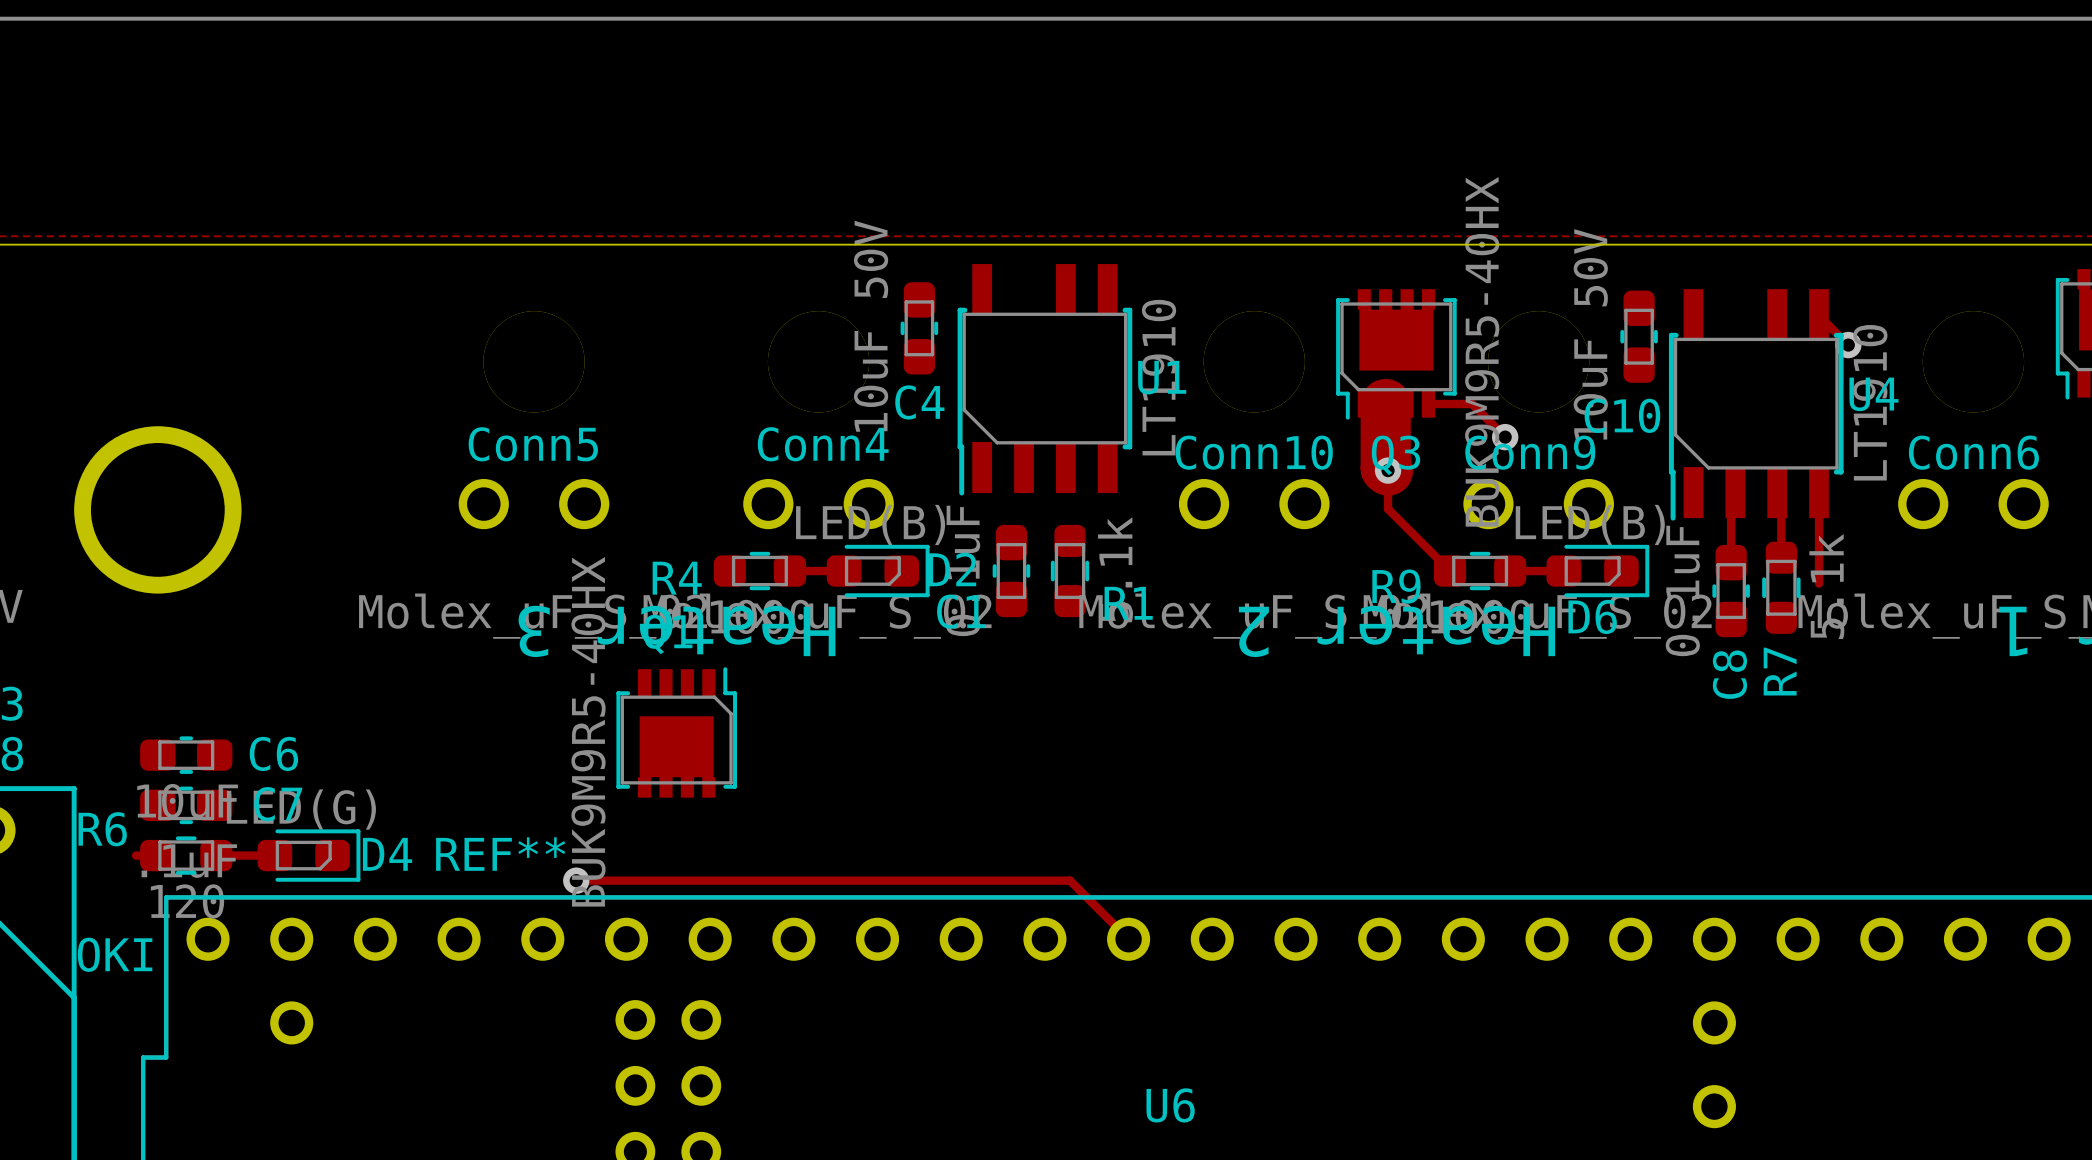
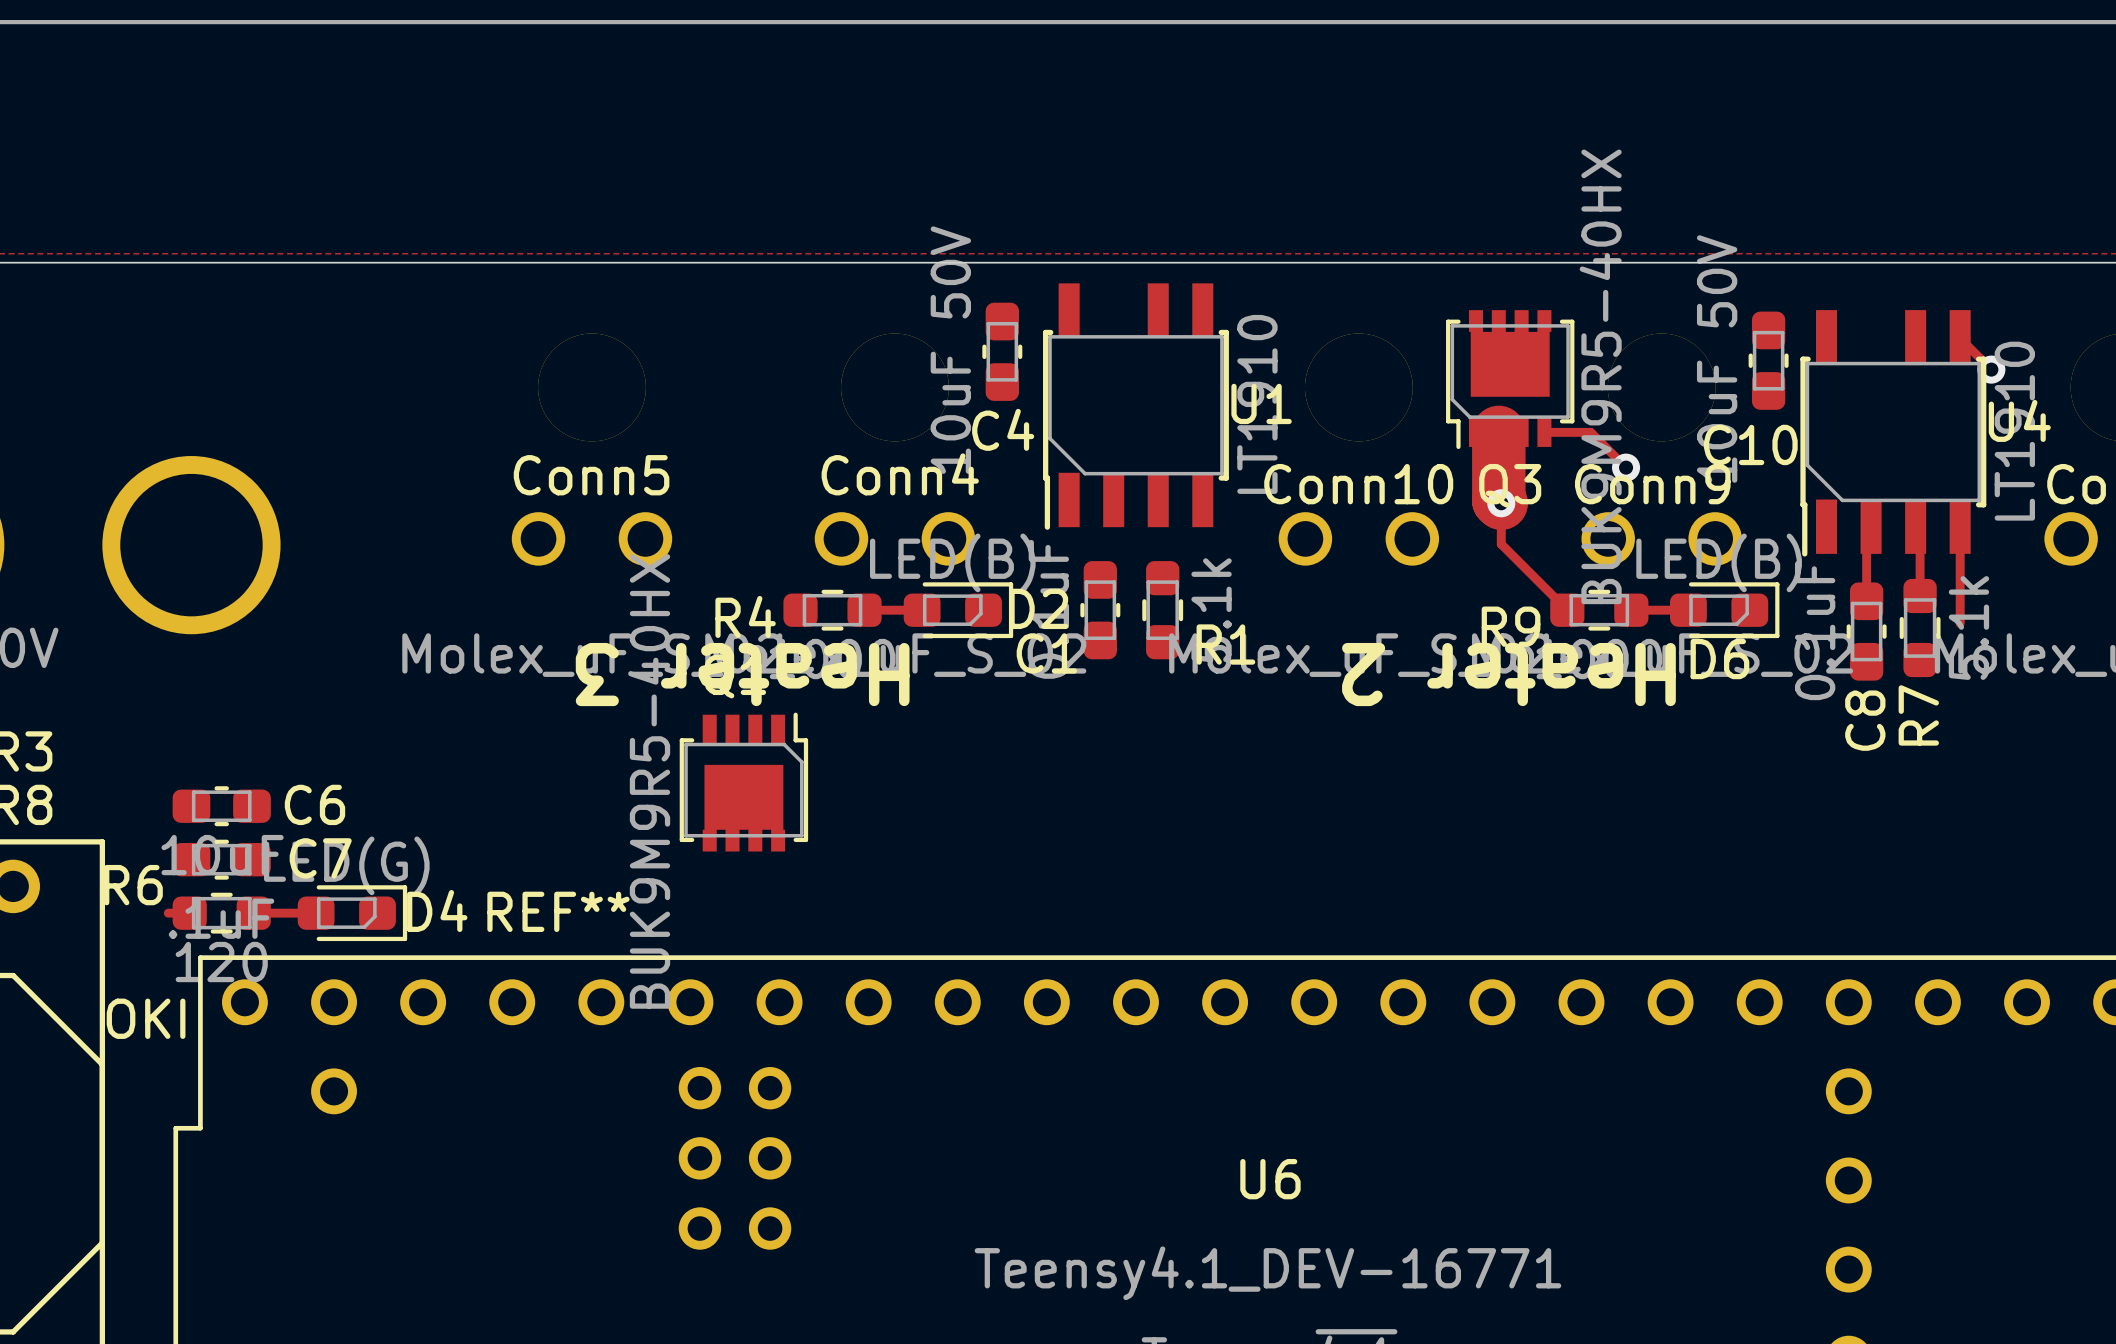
track: (576, 880) (1070, 880) (1128, 939) -> none
via: (576, 880) -> none

